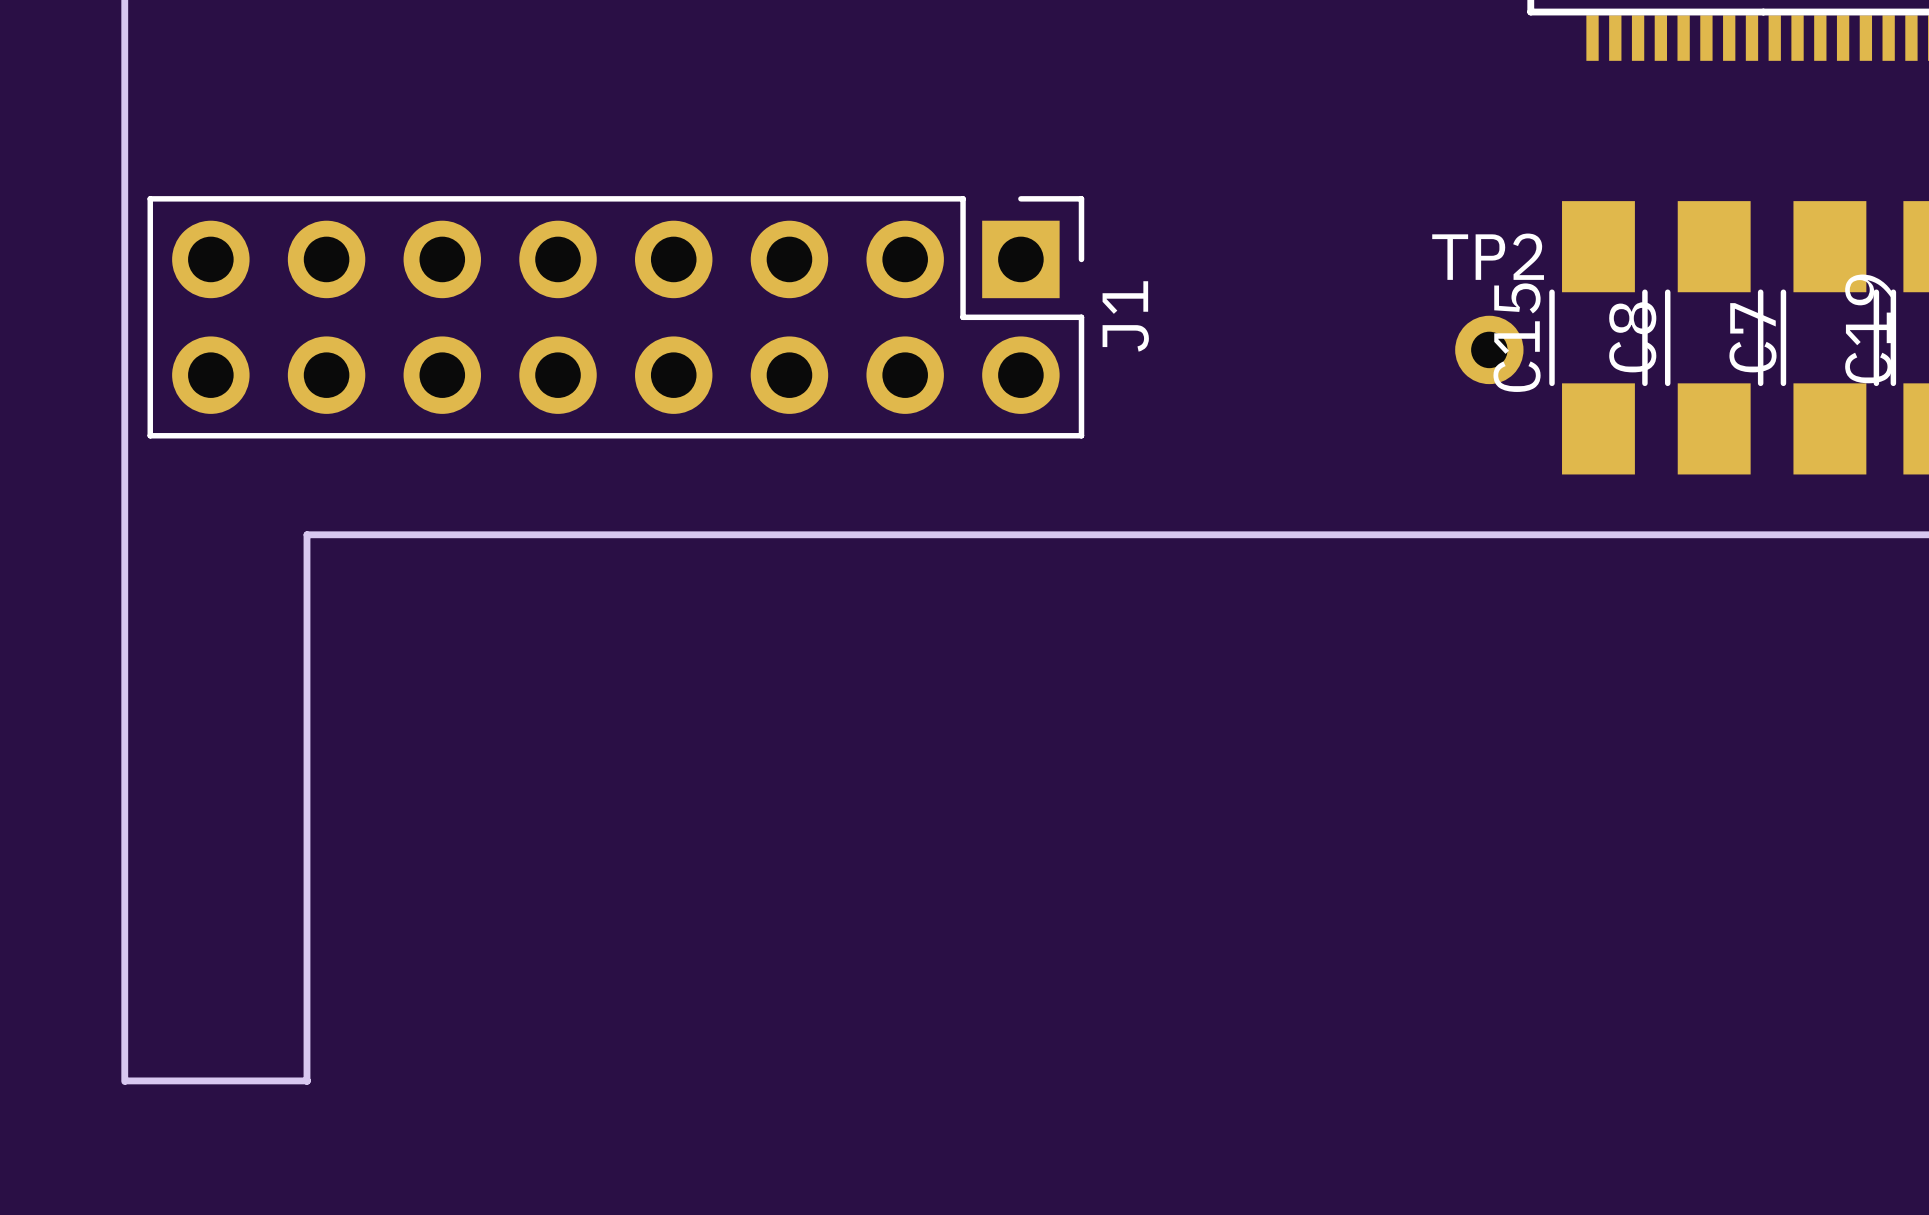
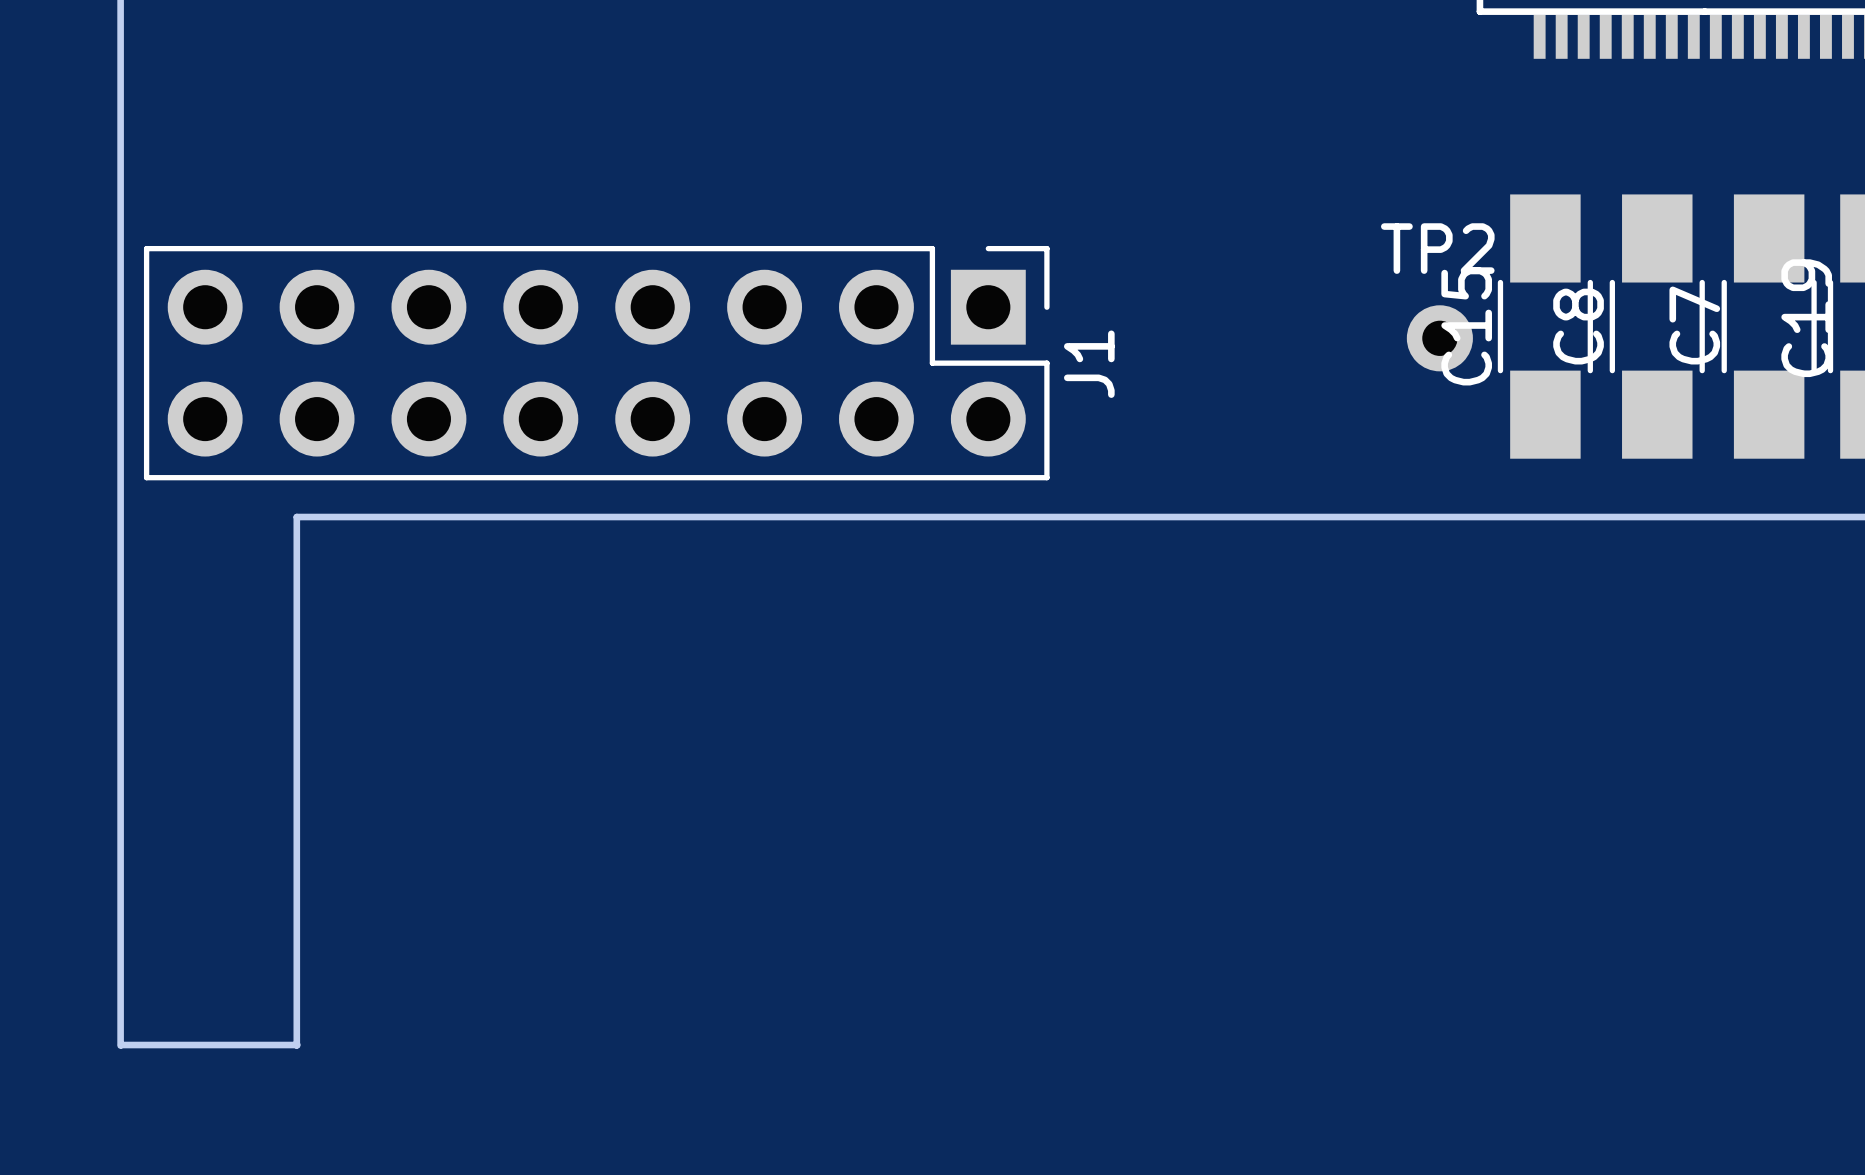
J1 position: (615, 317) -> (596, 363)

